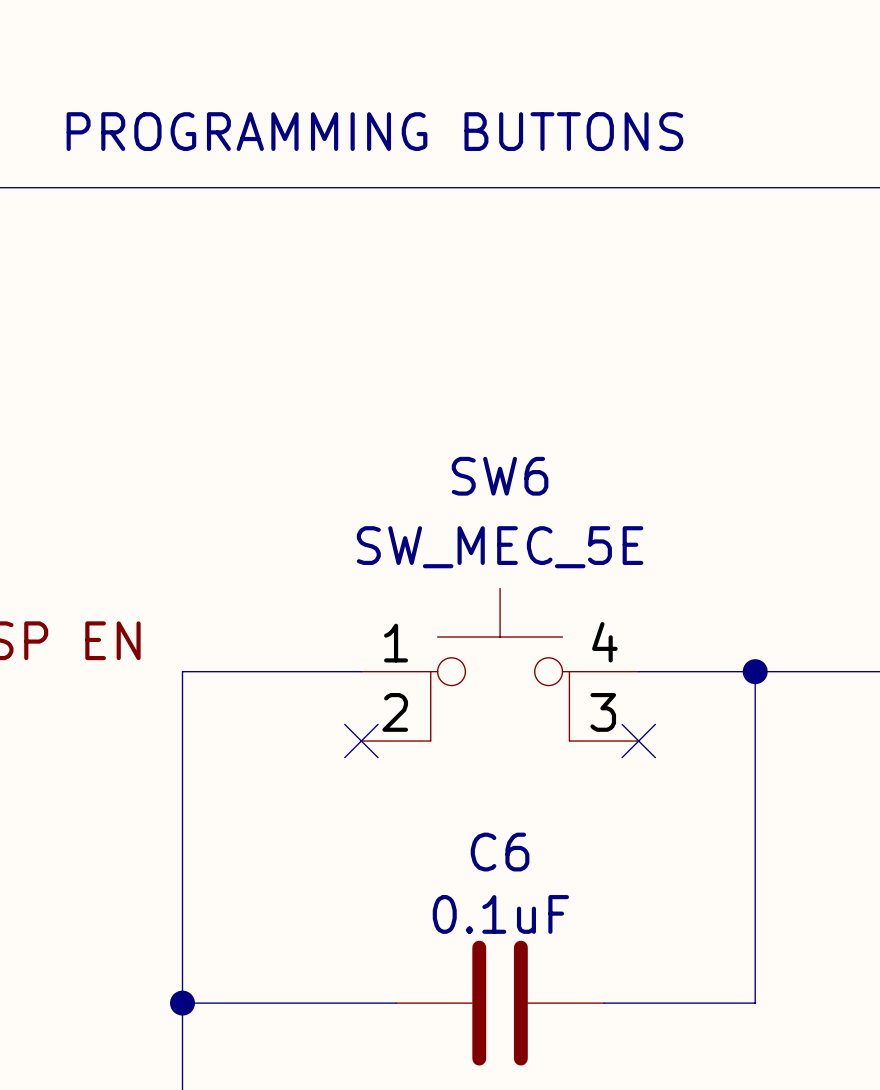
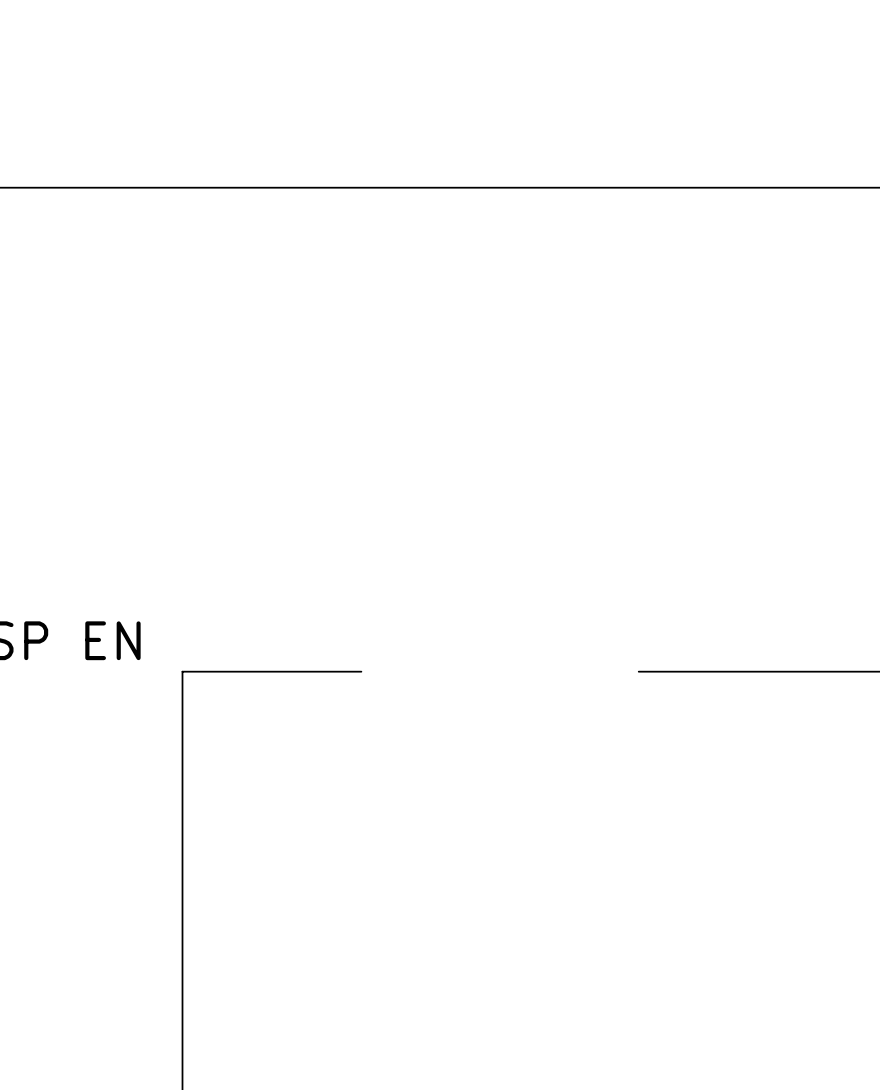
text: PROGRAMMING BUTTONS (374, 131) -> none
SW6: SW_MEC_5E (500, 664) -> none
wire: (755, 671) (755, 1003) (604, 1003) -> none
junction: (755, 671) -> none
no-connect mark: (361, 741) -> none
no-connect mark: (638, 741) -> none
wire: (182, 1003) (396, 1003) -> none
junction: (182, 1003) -> none
C6: 0.1uF (500, 1003) -> none

